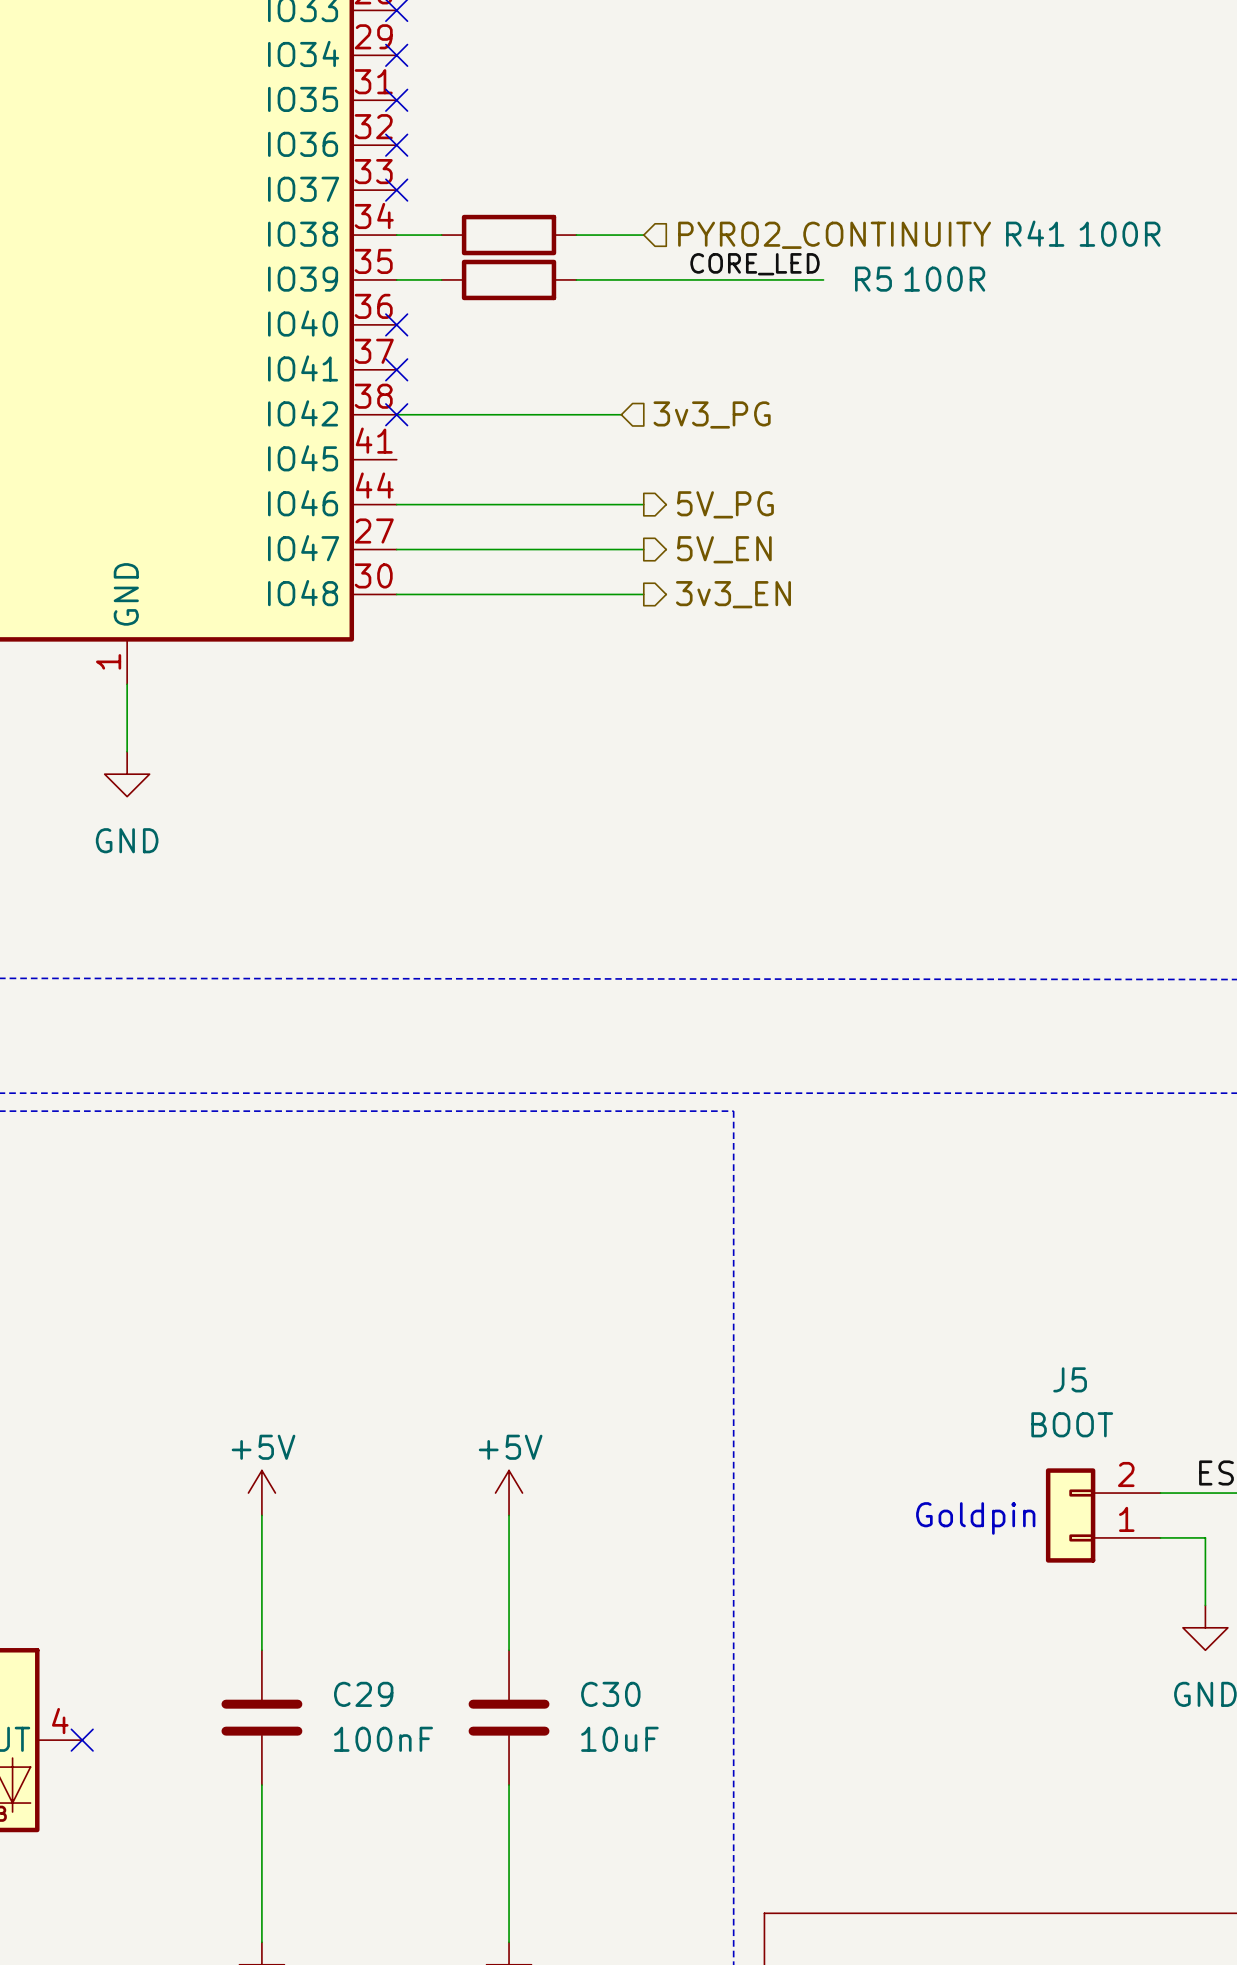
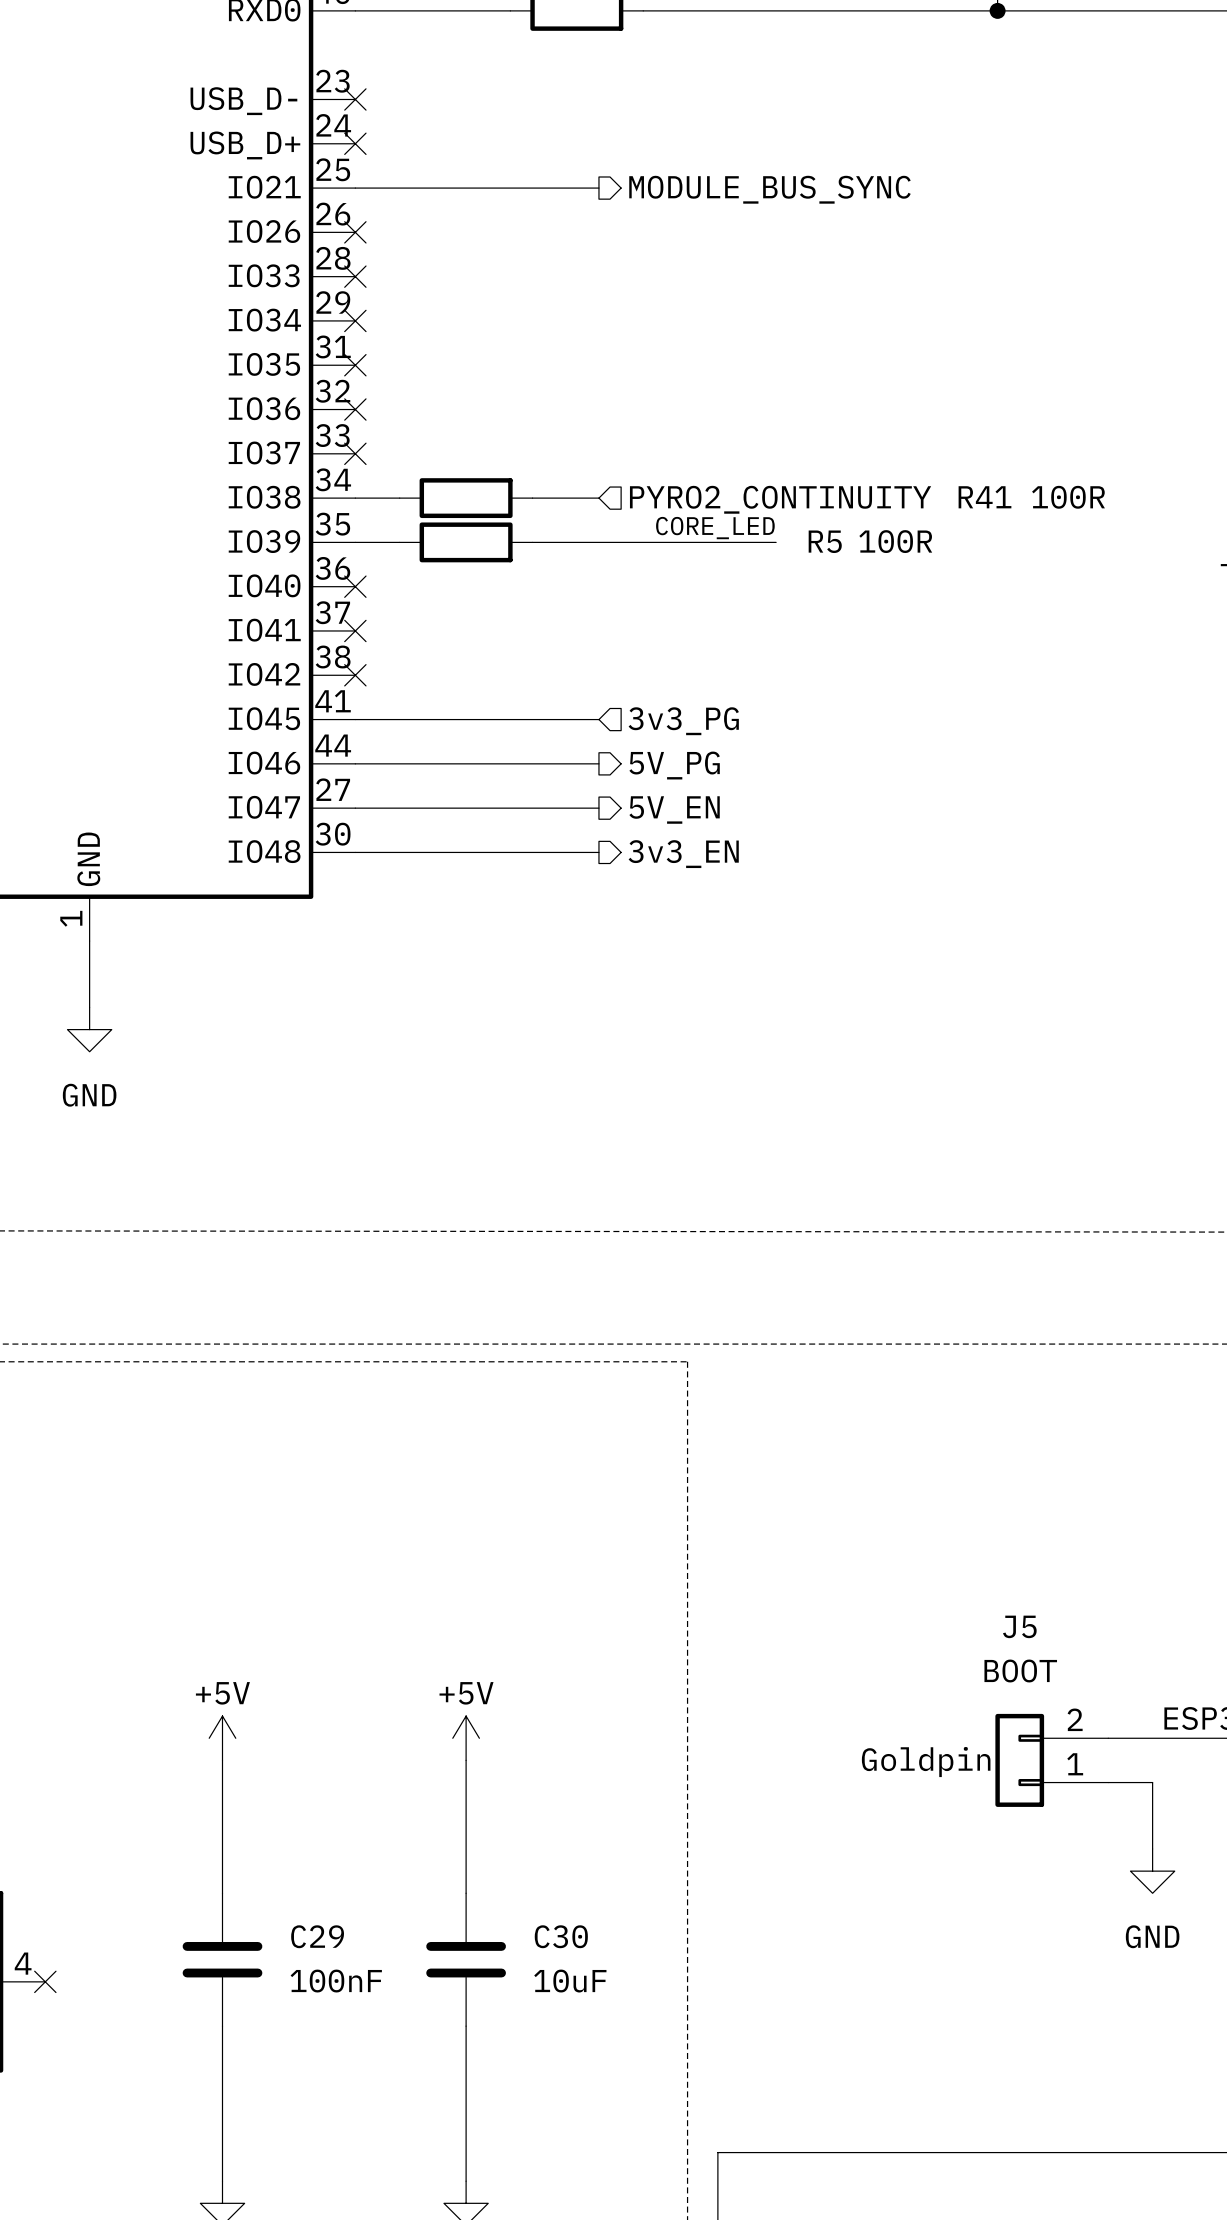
wire: (396, 414) (621, 414) -> none
hierarchical label position: 3v3_PG (712, 414) -> 3v3_PG (683, 721)
wire: none -> (355, 719) (598, 719)

